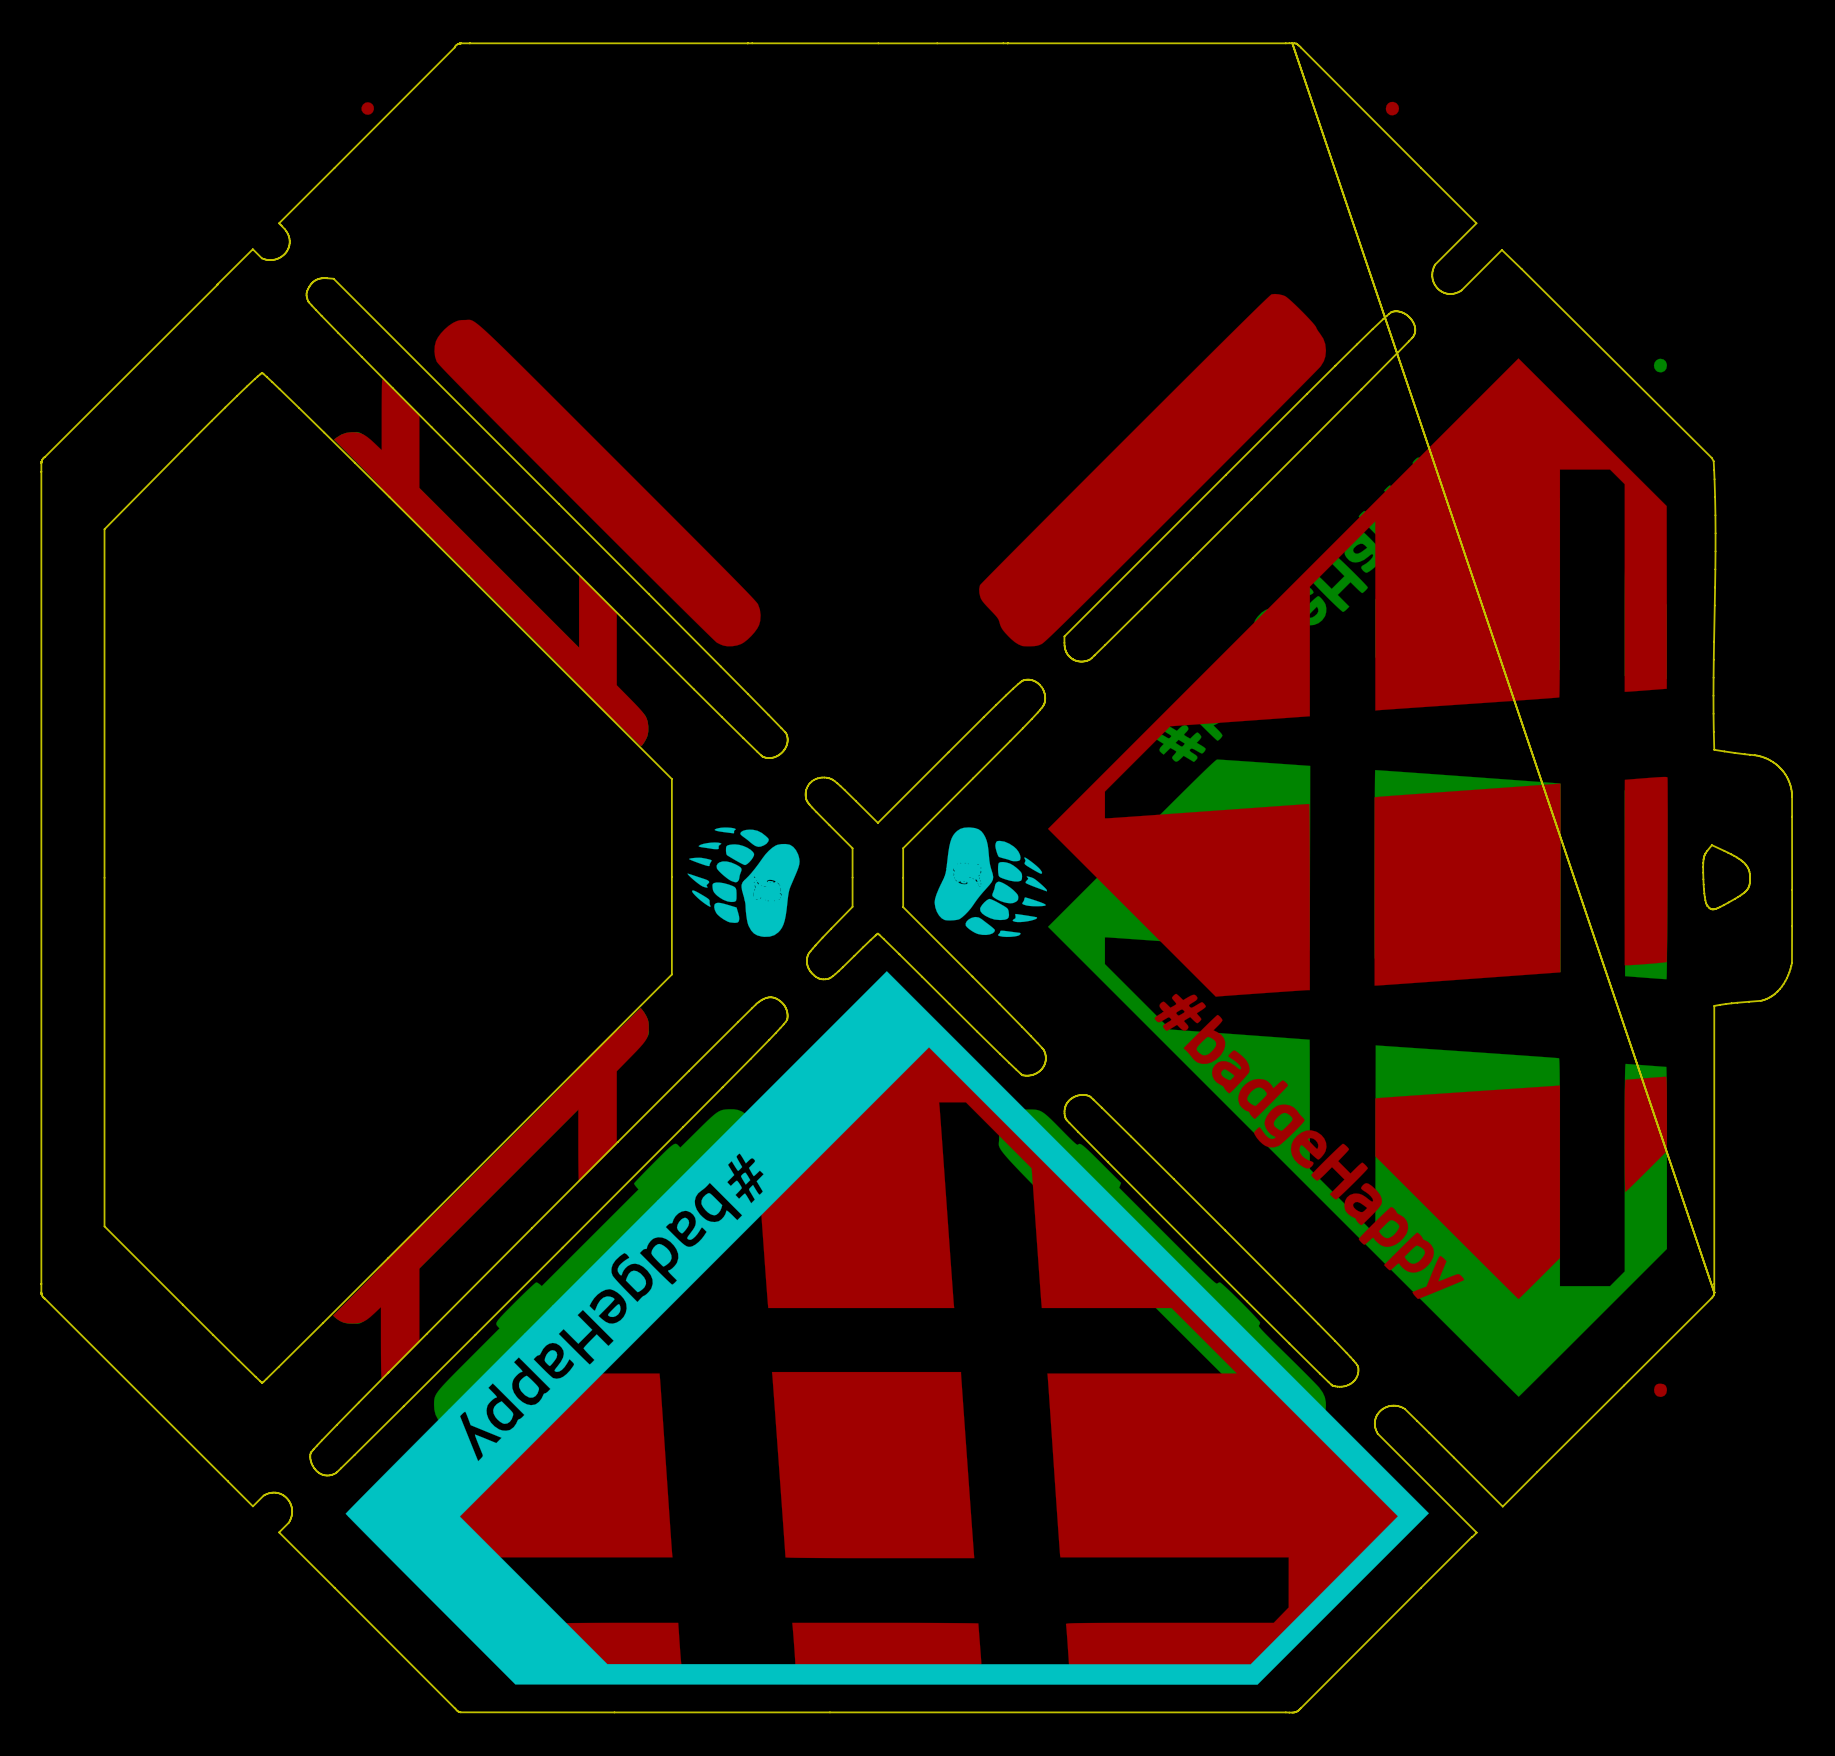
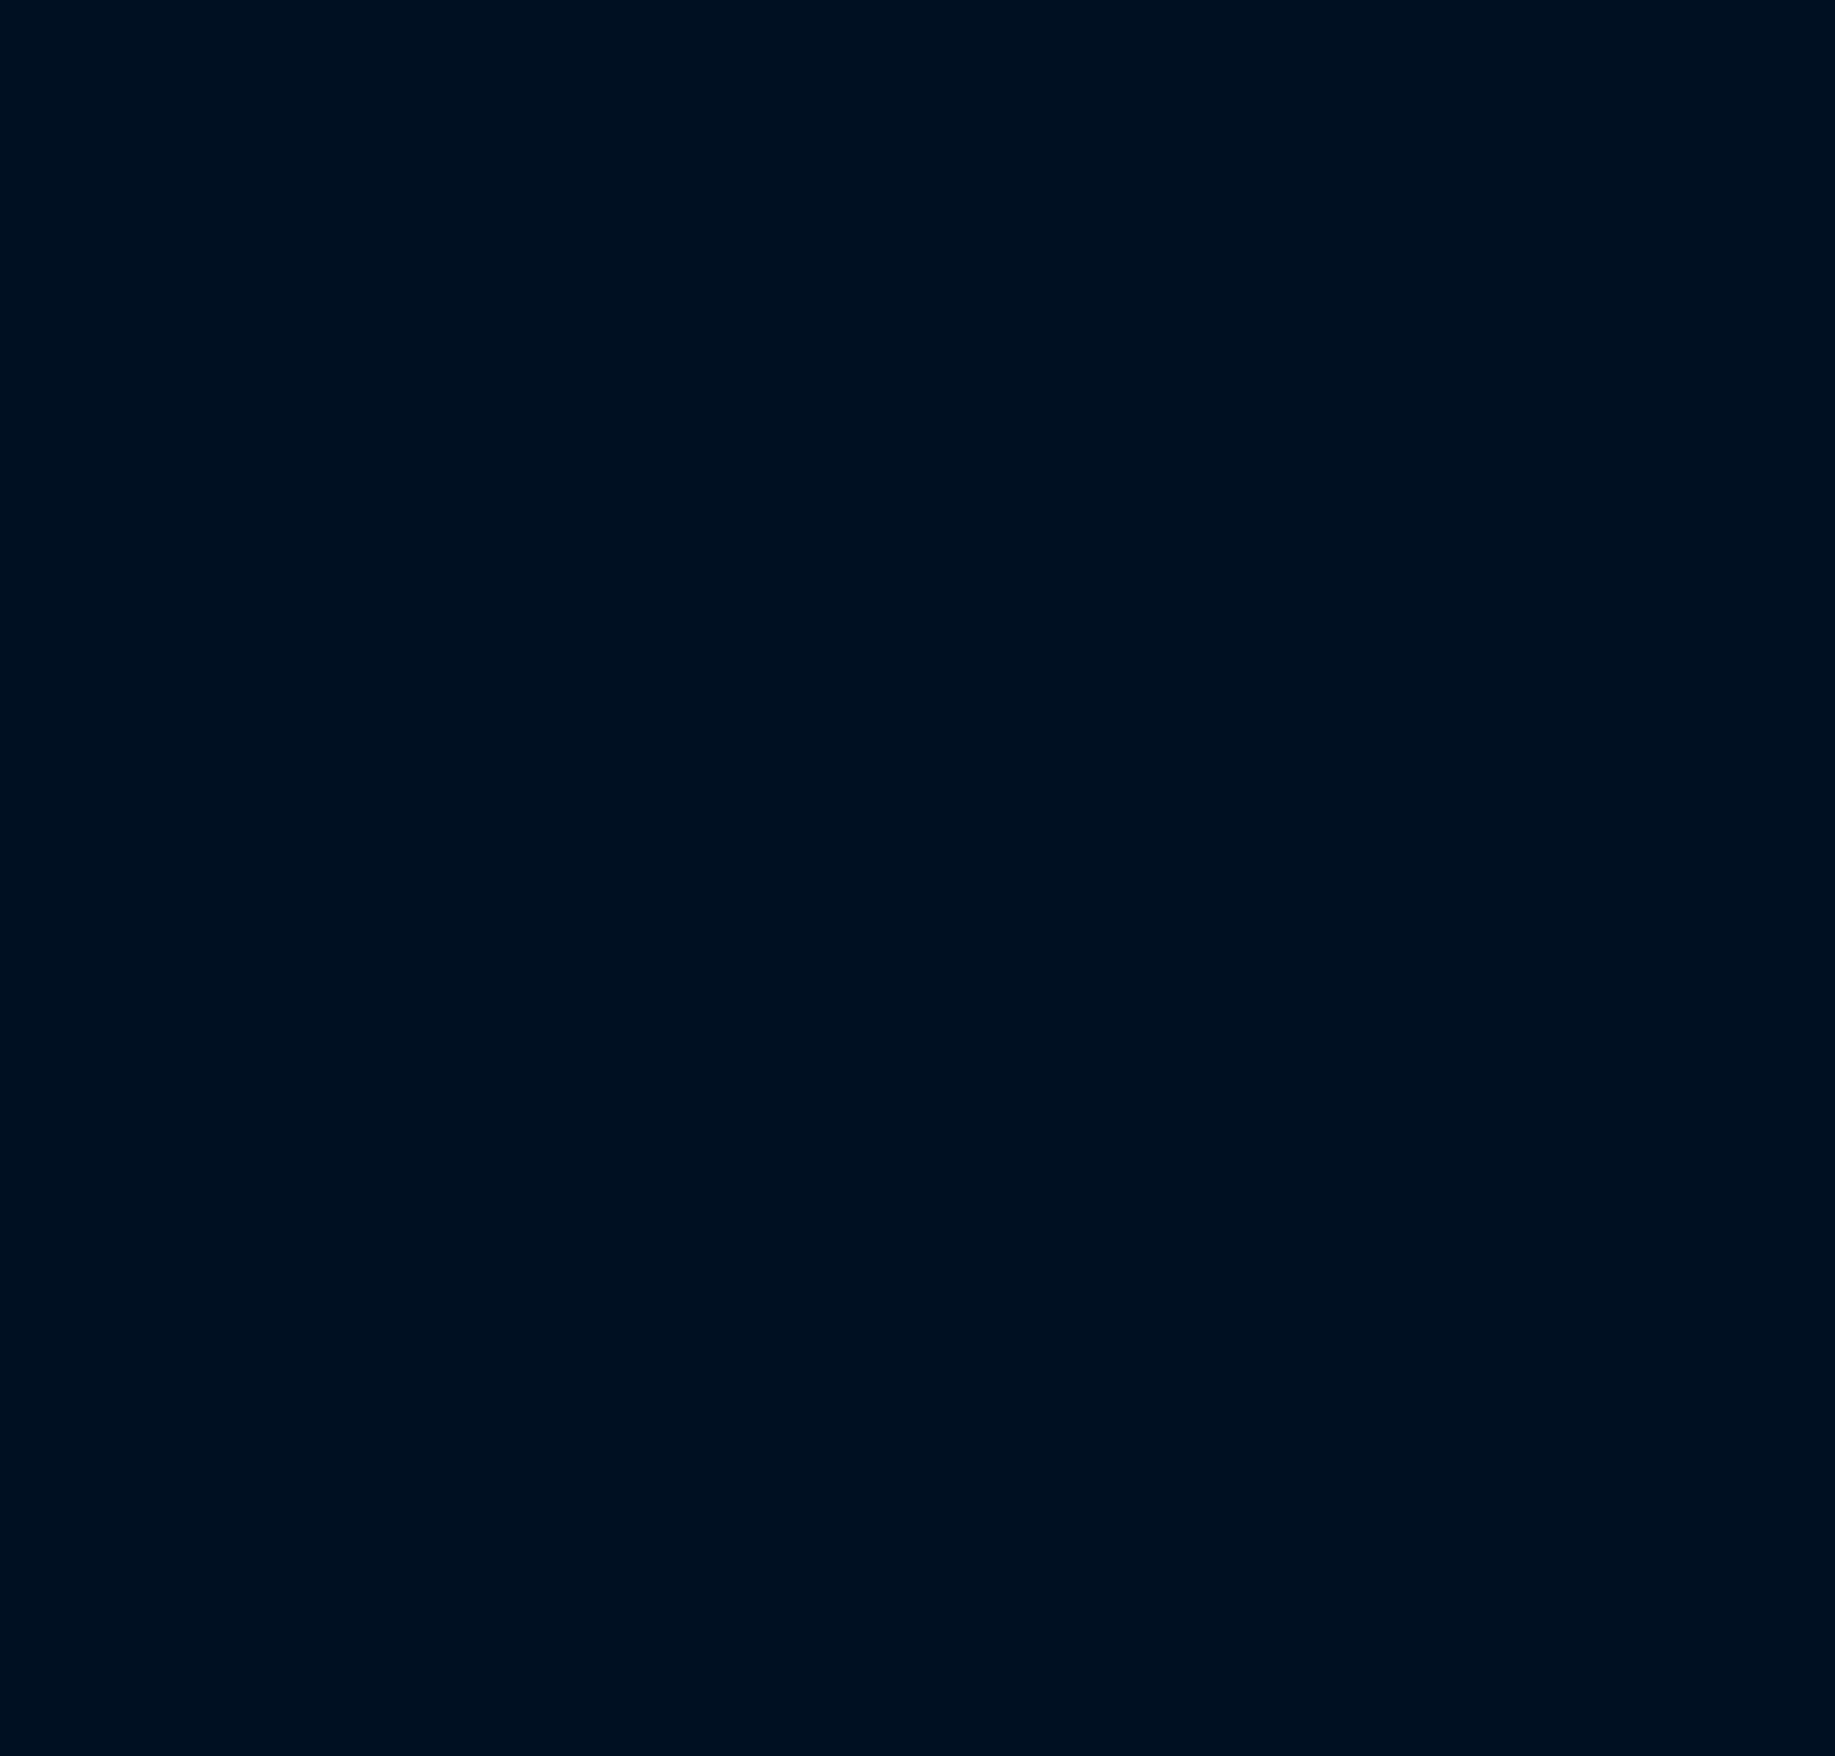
board edge: (459, 43) (279, 223) (286, 230) (289, 238) (289, 246) (284, 254) (276, 259) (267, 259) (261, 258) (252, 249) (217, 284) -> none
board edge: (460, 43) (1292, 43) -> none
board edge: (1292, 43) (1296, 43) -> none
board edge: (1292, 43) (1714, 1292) -> none
board edge: (1296, 43) (1476, 223) (1435, 264) (1432, 277) (1437, 288) (1448, 293) (1461, 290) (1501, 250) (1713, 461) (1715, 533) (1714, 749) (1756, 755) (1771, 760) (1786, 776) (1792, 796) (1791, 962) (1789, 972) (1779, 989) (1767, 998) (1714, 1005) (1714, 1292) -> none
drawing: [333, 101, 1668, 1685] -> none
board edge: (322, 278) (312, 282) (306, 293) (308, 301) (321, 315) (760, 755) (771, 757) (781, 752) (787, 739) (786, 733) (781, 728) (333, 278) (322, 278) -> none
board edge: (217, 284) (44, 457) -> none
board edge: (1395, 311) (1389, 313) (1356, 344) (1064, 636) (1065, 649) (1070, 657) (1080, 661) (1091, 658) (1411, 338) (1415, 331) (1412, 321) (1405, 314) (1395, 311) -> none
board edge: (262, 372) (671, 779) (671, 974) (262, 1382) (104, 1226) (104, 529) (261, 373) -> none
board edge: (44, 457) (41, 462) -> none
board edge: (41, 462) (41, 1293) -> none
board edge: (1027, 679) (1021, 681) (1005, 695) (877, 822) (830, 778) (822, 777) (813, 780) (807, 785) (805, 794) (809, 804) (852, 848) (852, 906) (808, 953) (806, 962) (810, 971) (819, 978) (830, 977) (877, 933) (1009, 1062) (1021, 1074) (1026, 1075) (1036, 1073) (1043, 1067) (1045, 1059) (1043, 1050) (903, 907) (903, 848) (1042, 706) (1045, 698) (1042, 689) (1035, 681) (1027, 679) -> none
board edge: (1711, 845) (1704, 855) (1703, 872) (1705, 902) (1713, 909) (1743, 892) (1749, 886) (1750, 877) (1748, 868) (1743, 862) (1711, 845) -> none
board edge: (770, 997) (757, 1002) (738, 1022) (322, 1440) (310, 1454) (311, 1463) (316, 1470) (326, 1475) (337, 1471) (769, 1039) (785, 1021) (787, 1016) (783, 1003) (777, 999) (770, 997) -> none
board edge: (1080, 1094) (1071, 1098) (1065, 1105) (1064, 1115) (1069, 1122) (1331, 1384) (1341, 1386) (1352, 1382) (1357, 1374) (1358, 1366) (1346, 1352) (1101, 1107) (1090, 1096) (1080, 1094) -> none
board edge: (1714, 1292) (1711, 1298) (1502, 1506) (1404, 1408) (1391, 1405) (1379, 1411) (1374, 1422) (1377, 1433) (1476, 1532) (1472, 1537) -> none
board edge: (41, 1293) (44, 1298) -> none
board edge: (44, 1298) (252, 1506) (263, 1495) (268, 1493) (278, 1493) (286, 1497) (291, 1506) (291, 1516) (288, 1522) (279, 1532) (460, 1712) (1294, 1712) (1299, 1709) (1471, 1537) -> none

